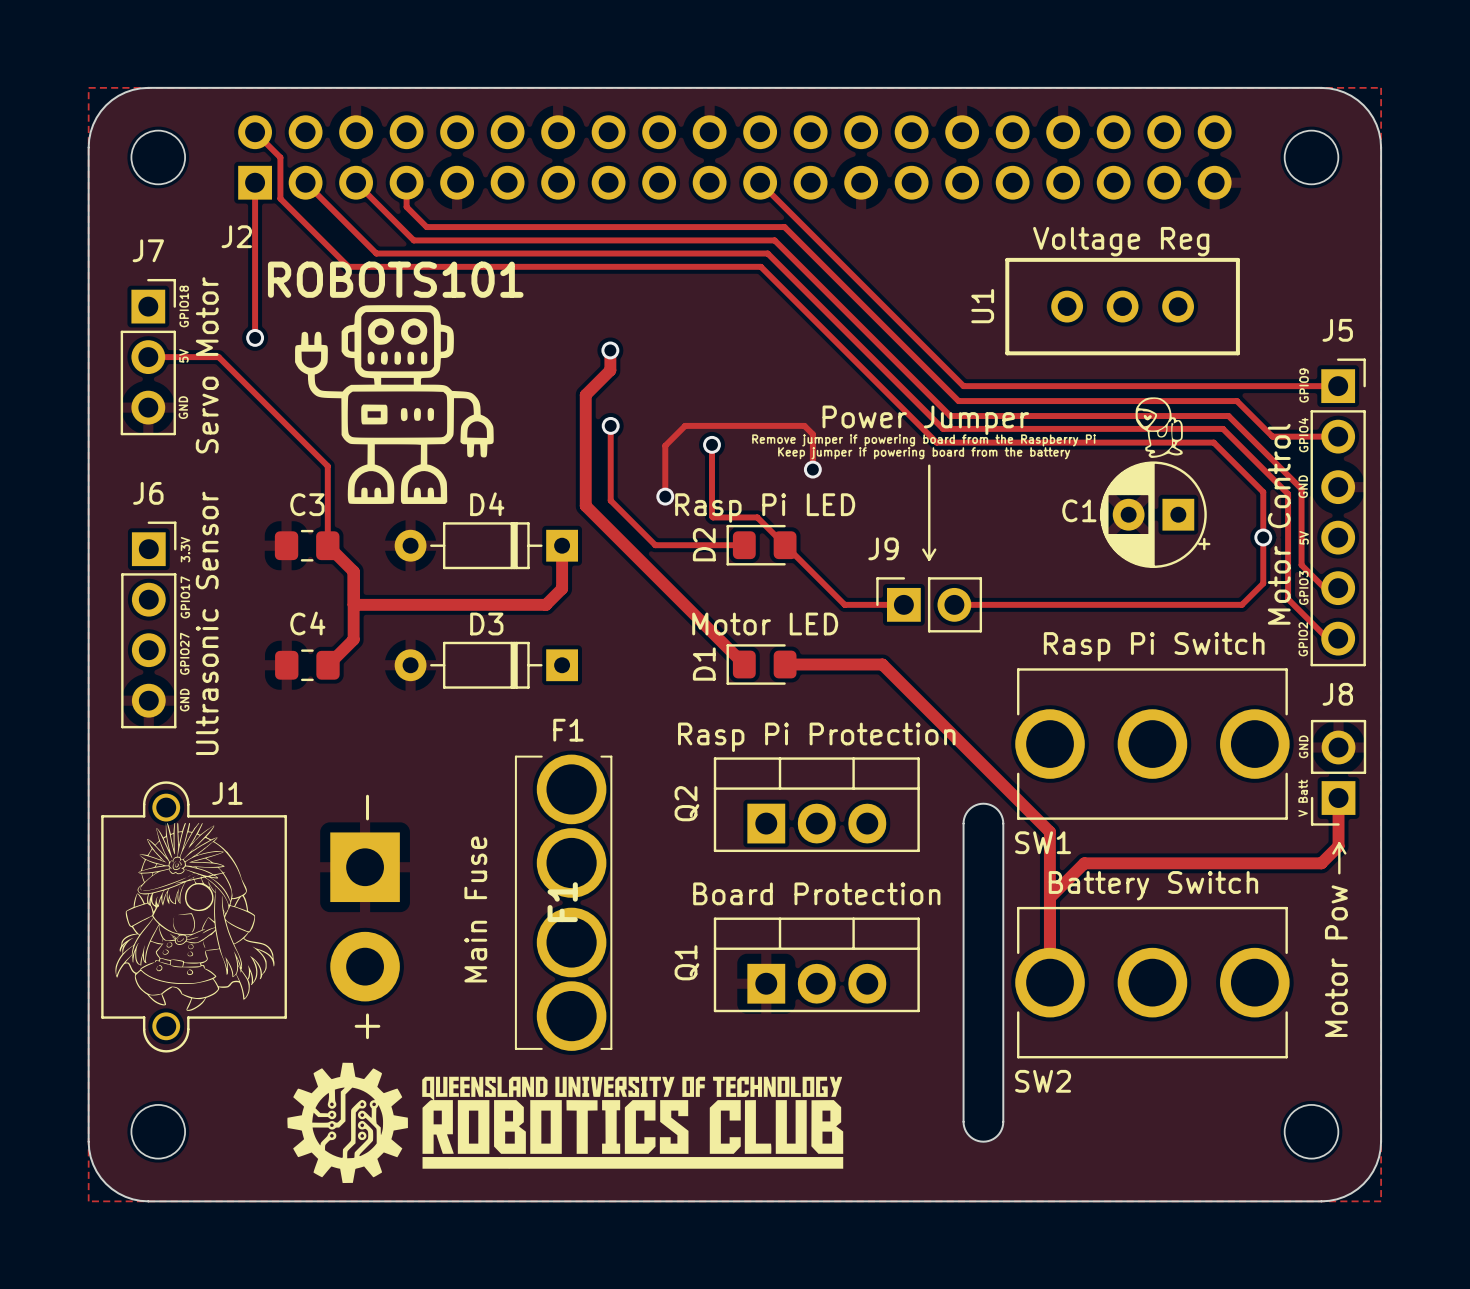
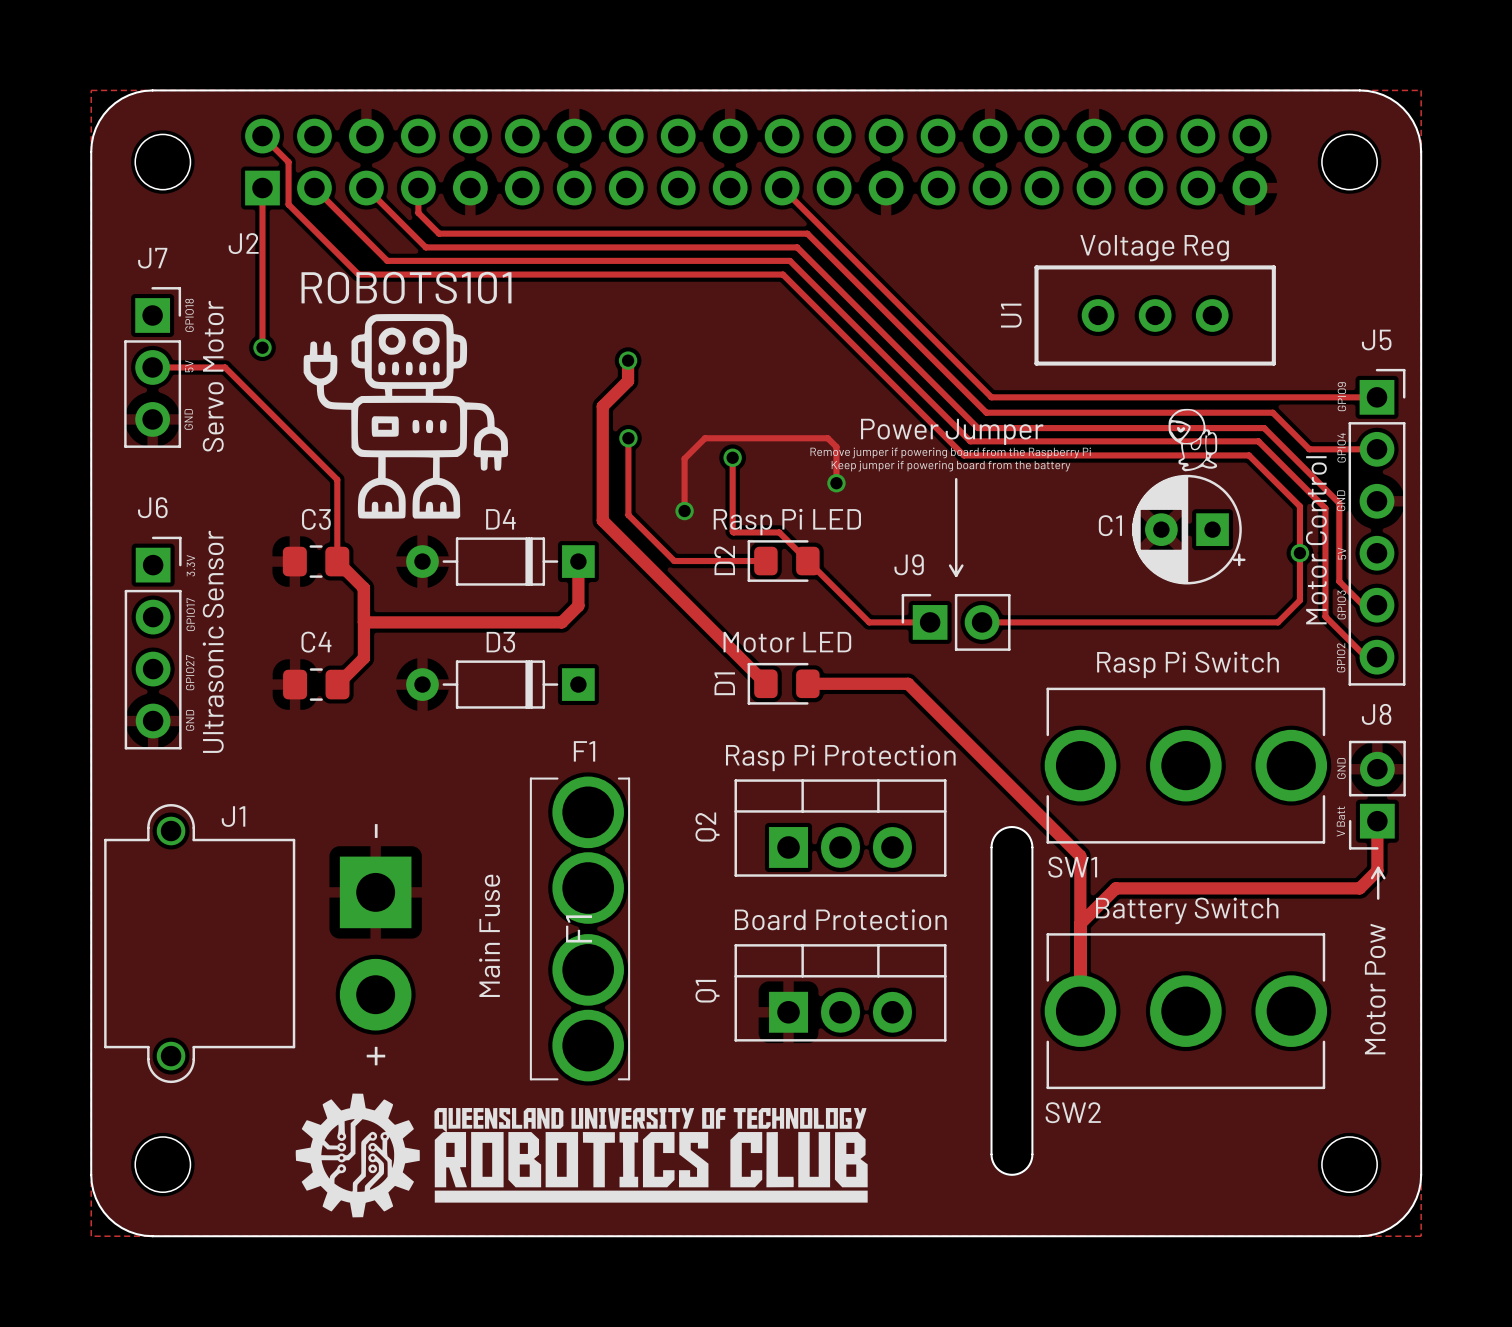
part: (194, 916) -> none

